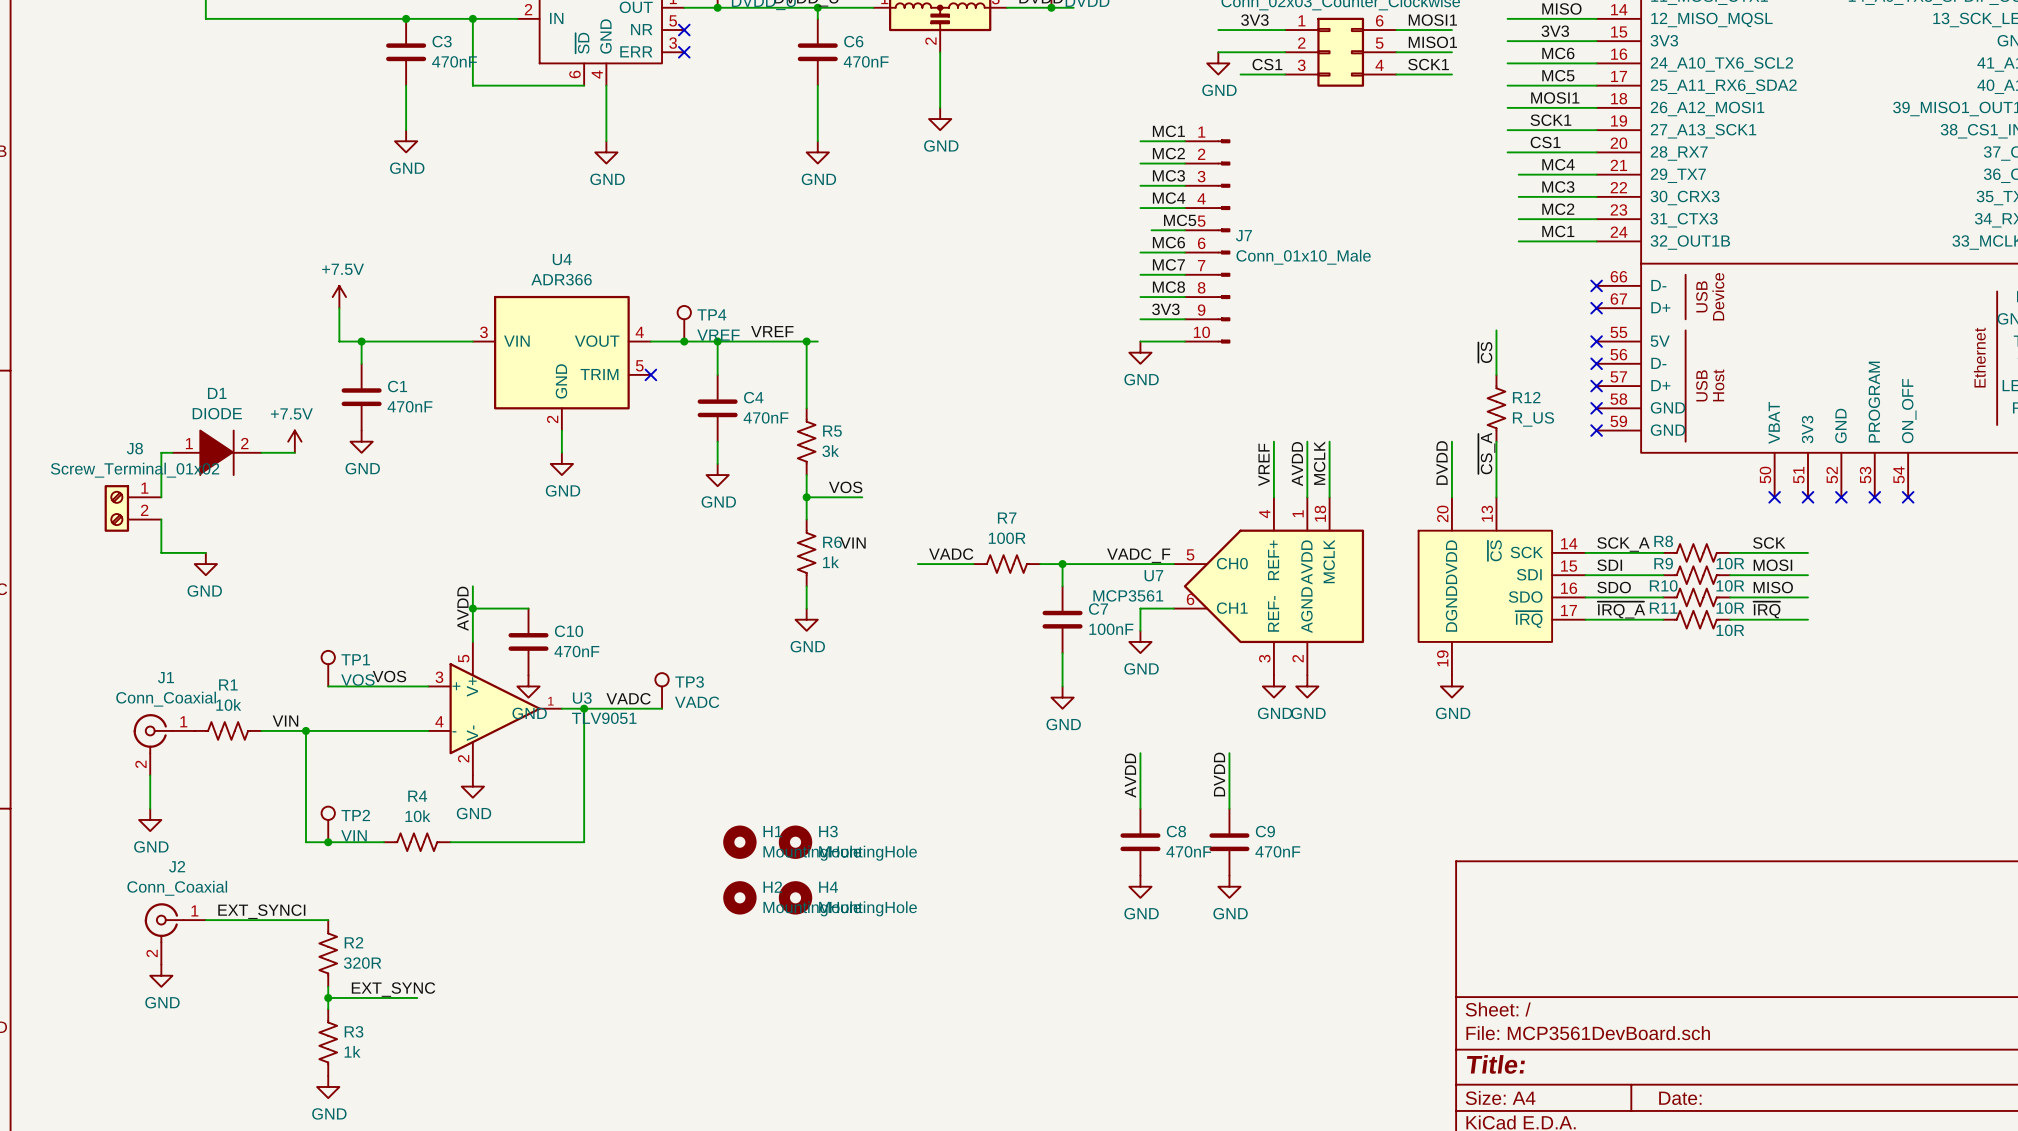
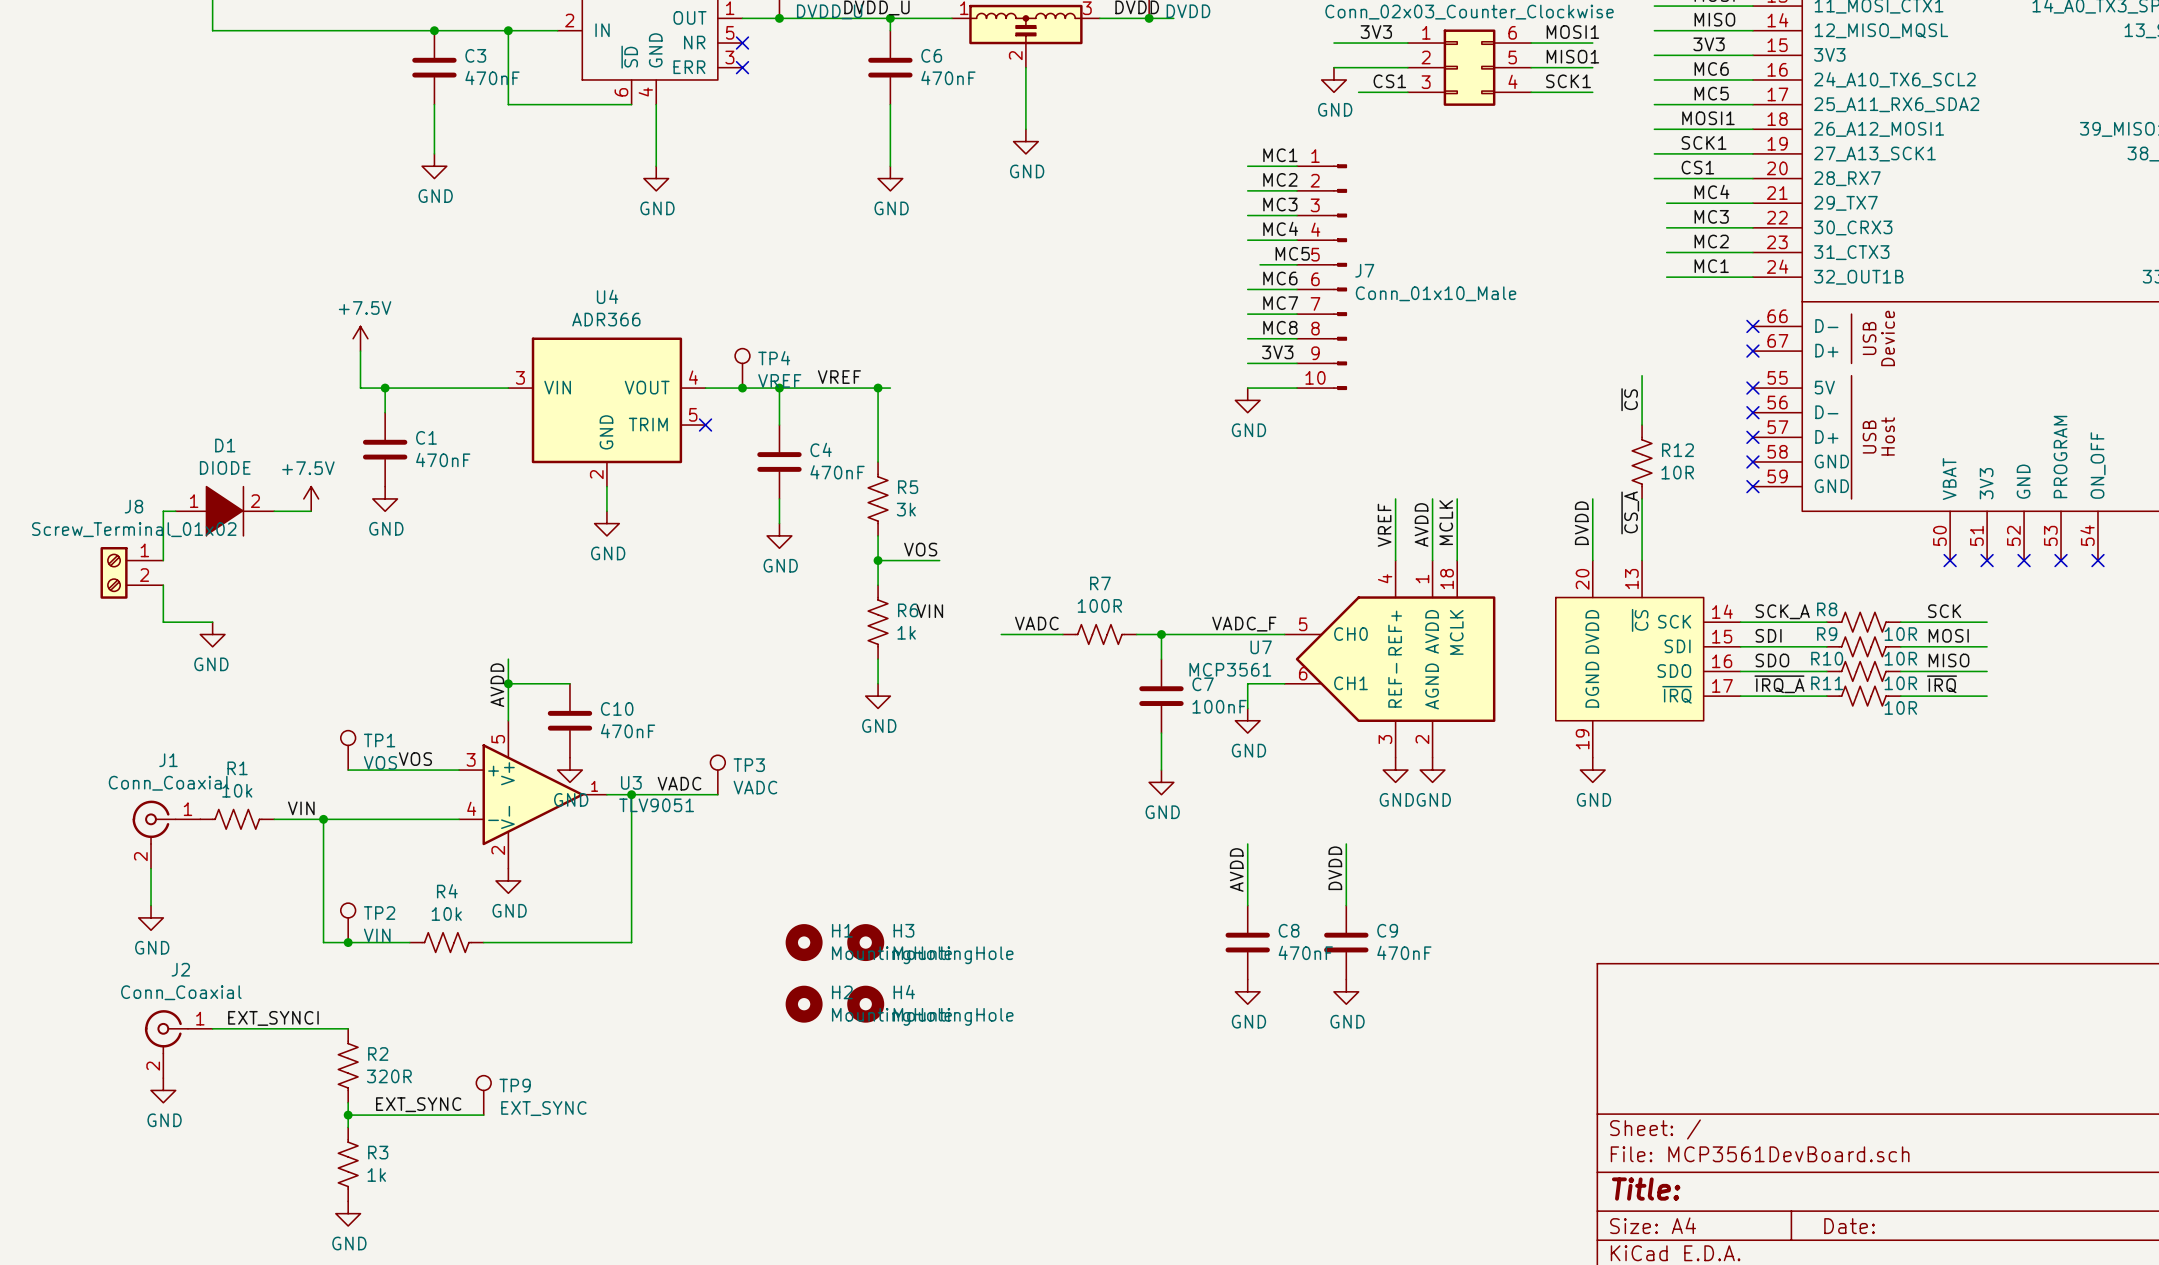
R12 value: R_US (1533, 419) -> 10R (1677, 472)
TP9: none -> EXT_SYNC (483, 1095)
wire: none -> (446, 1115) (483, 1115)

